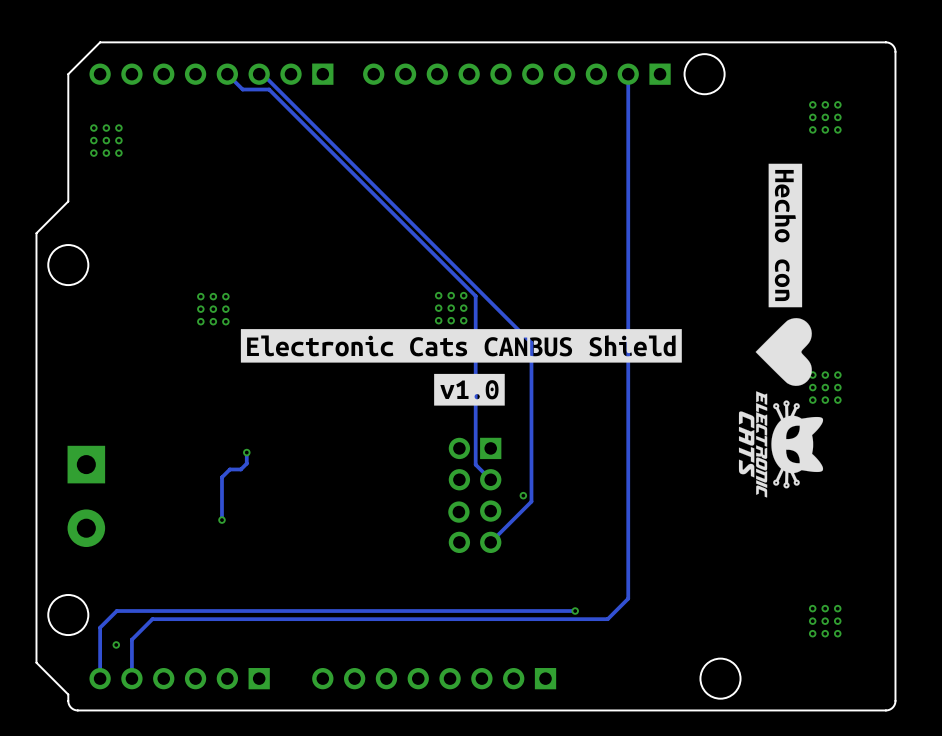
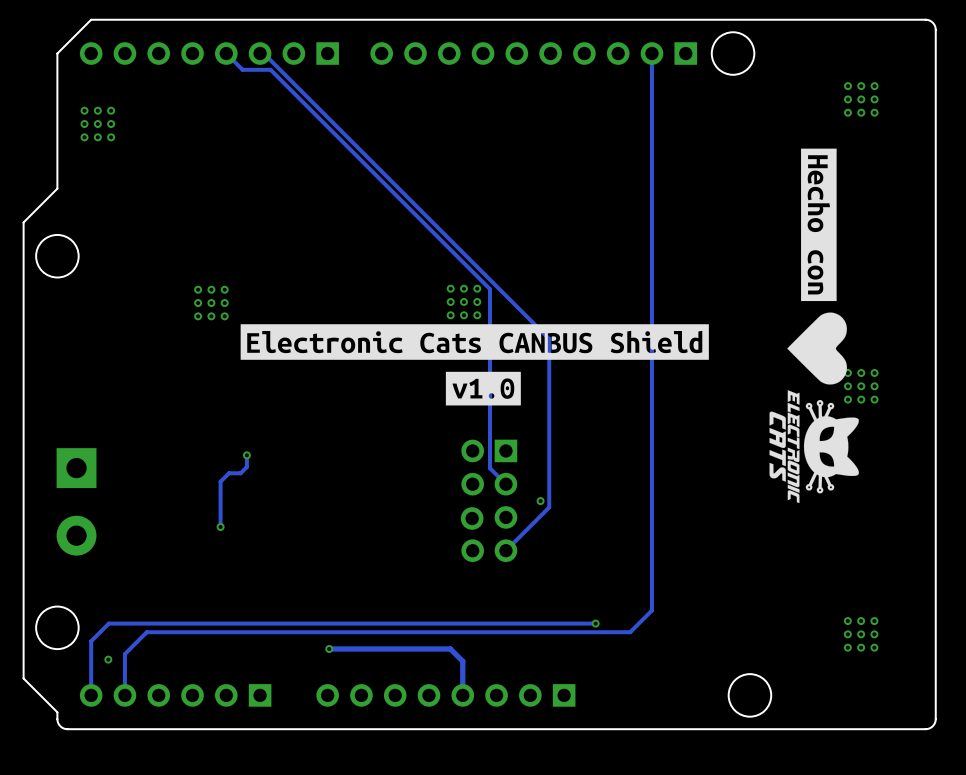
track: none -> (329, 648) (450, 648) (462, 661) (462, 695)
via: none -> (329, 648)

